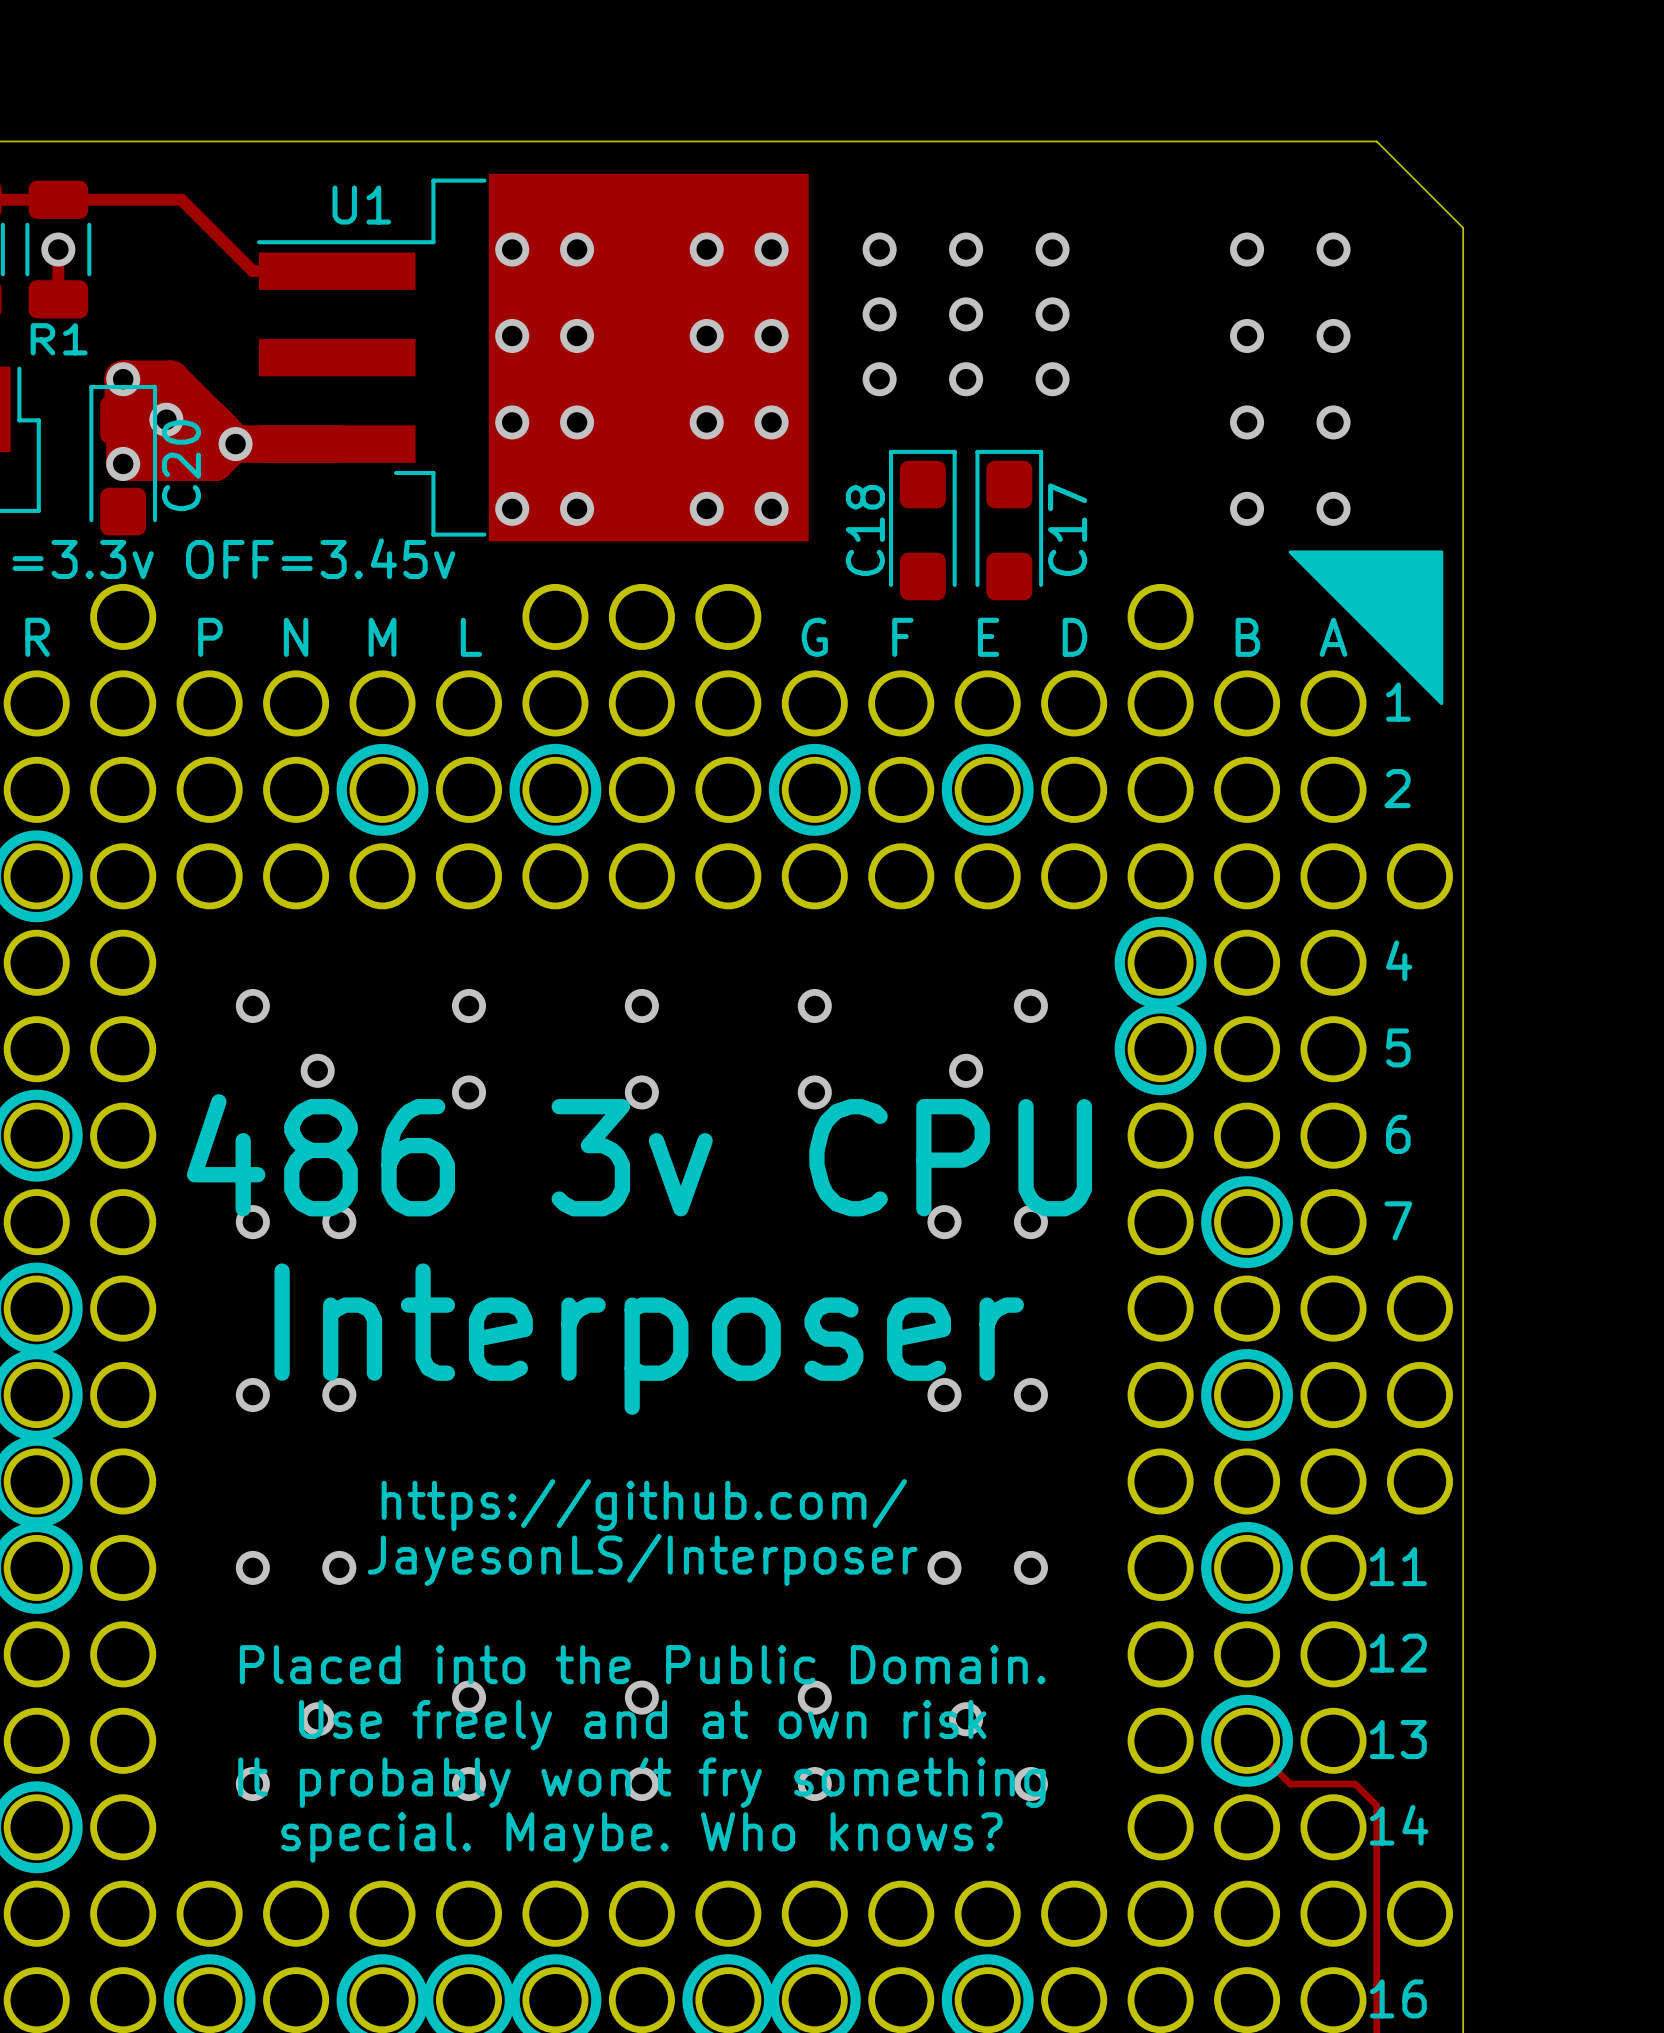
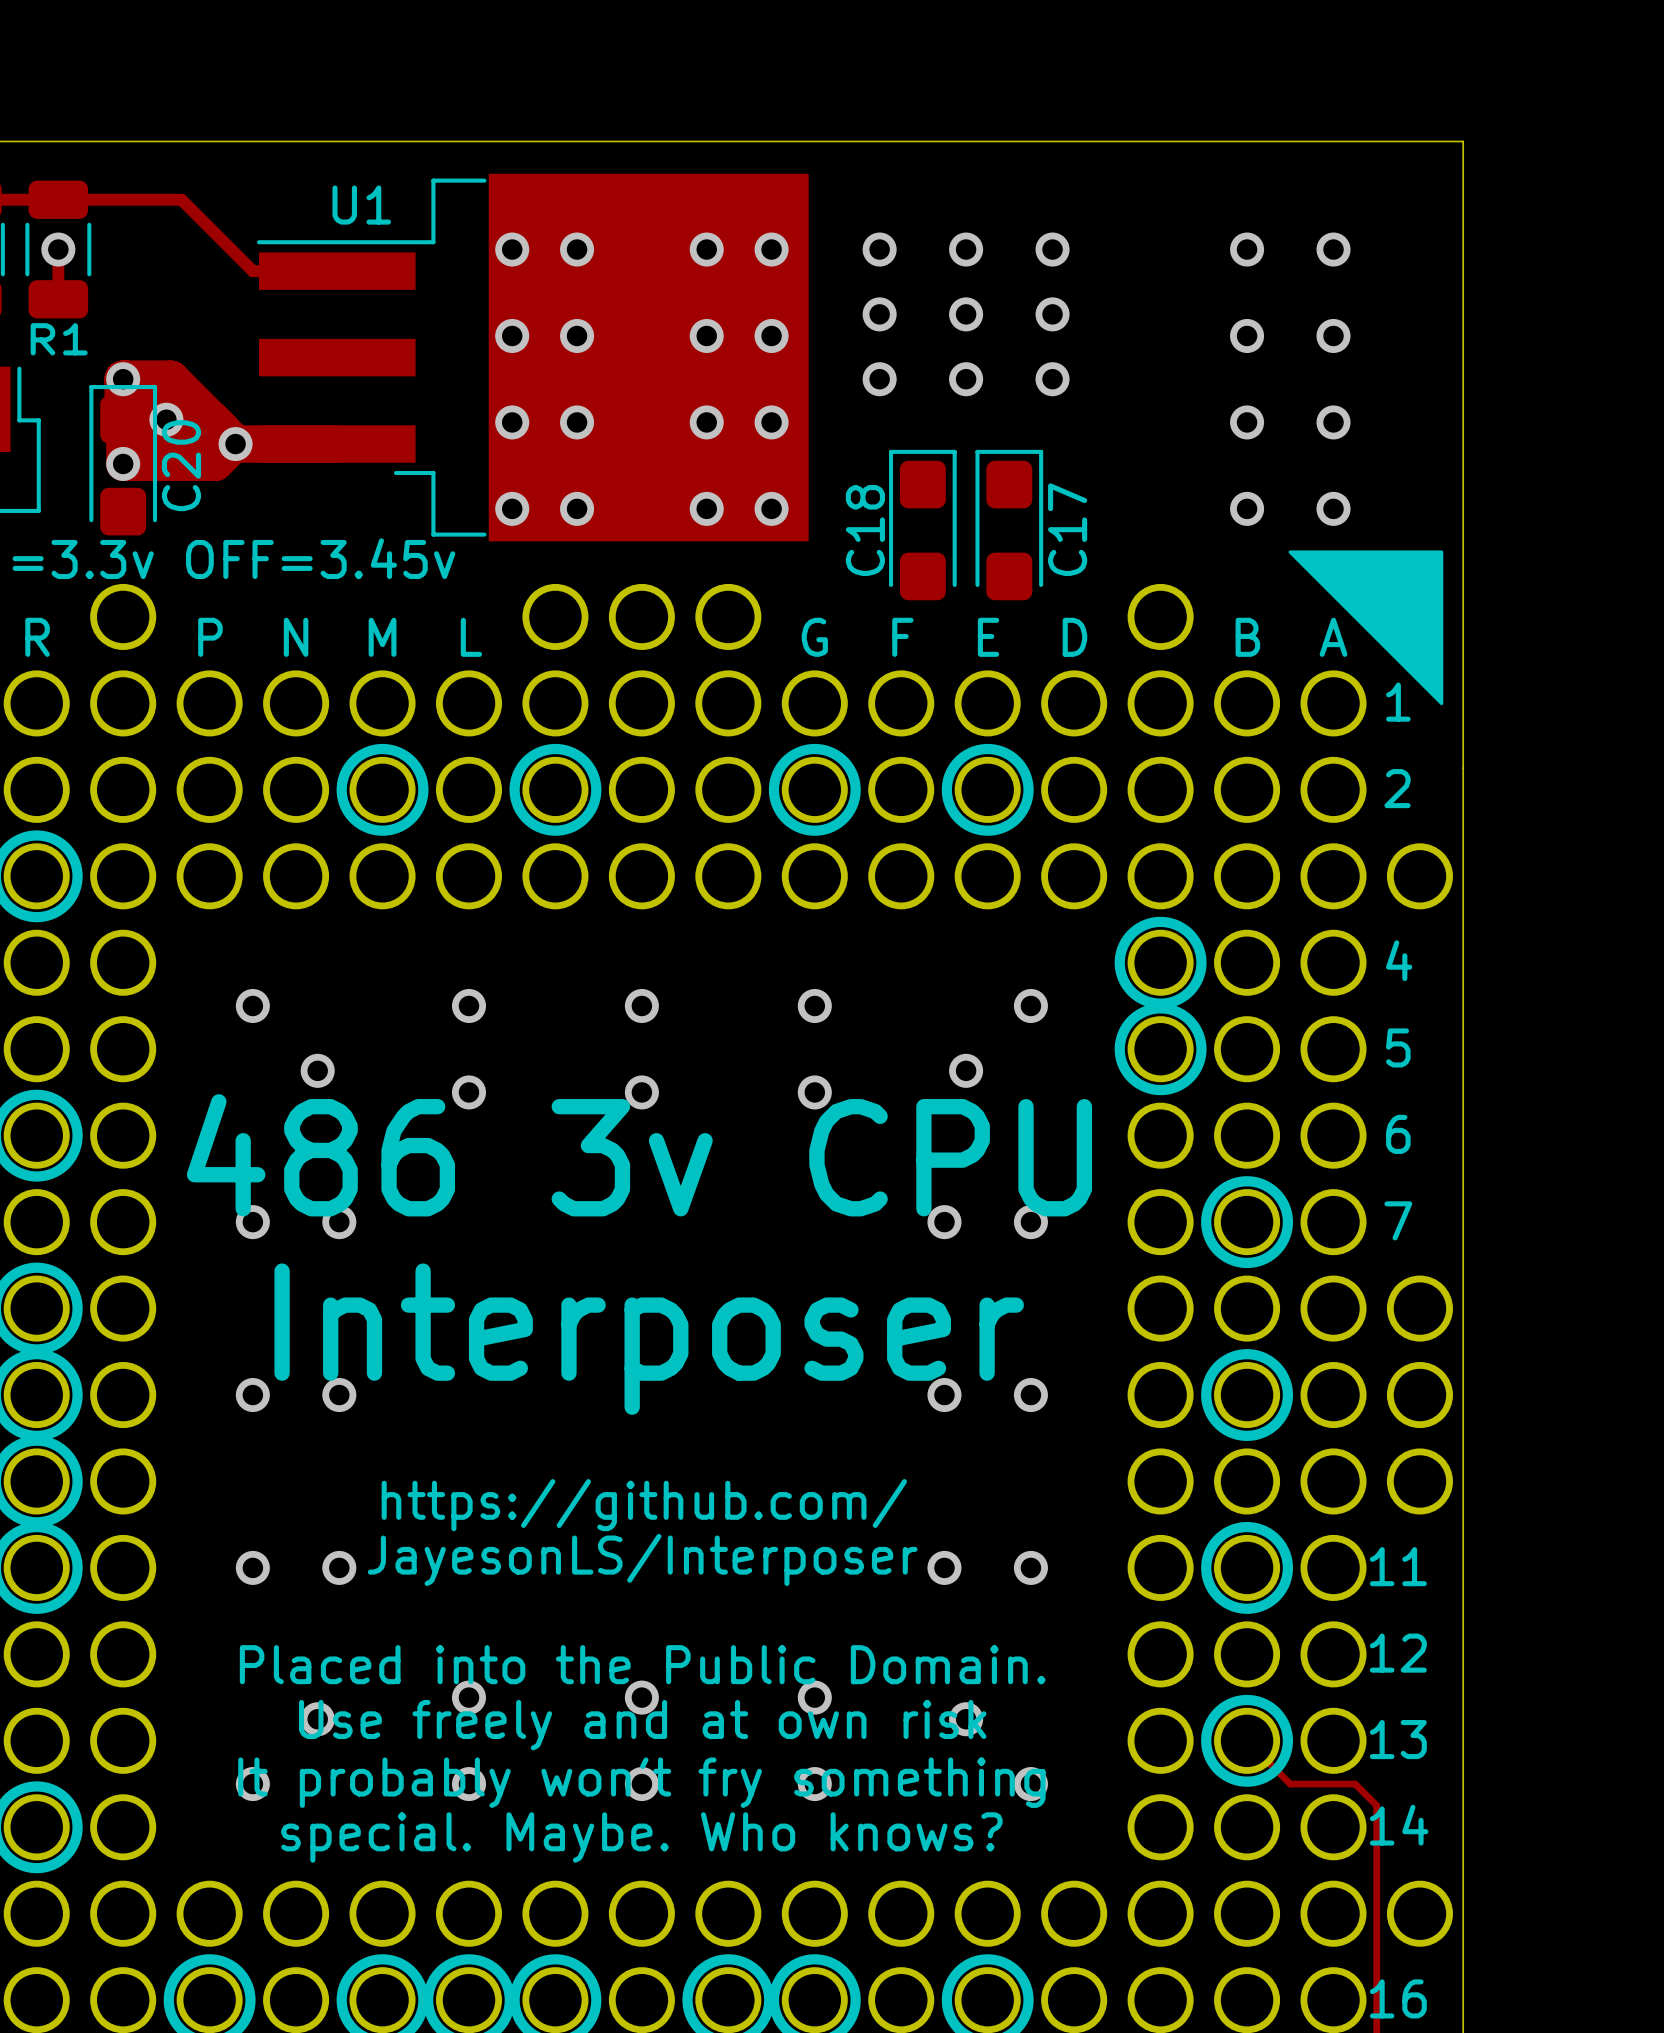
board edge: (1376, 141) (1463, 227) -> (1376, 141) (1463, 141) (1463, 227)

